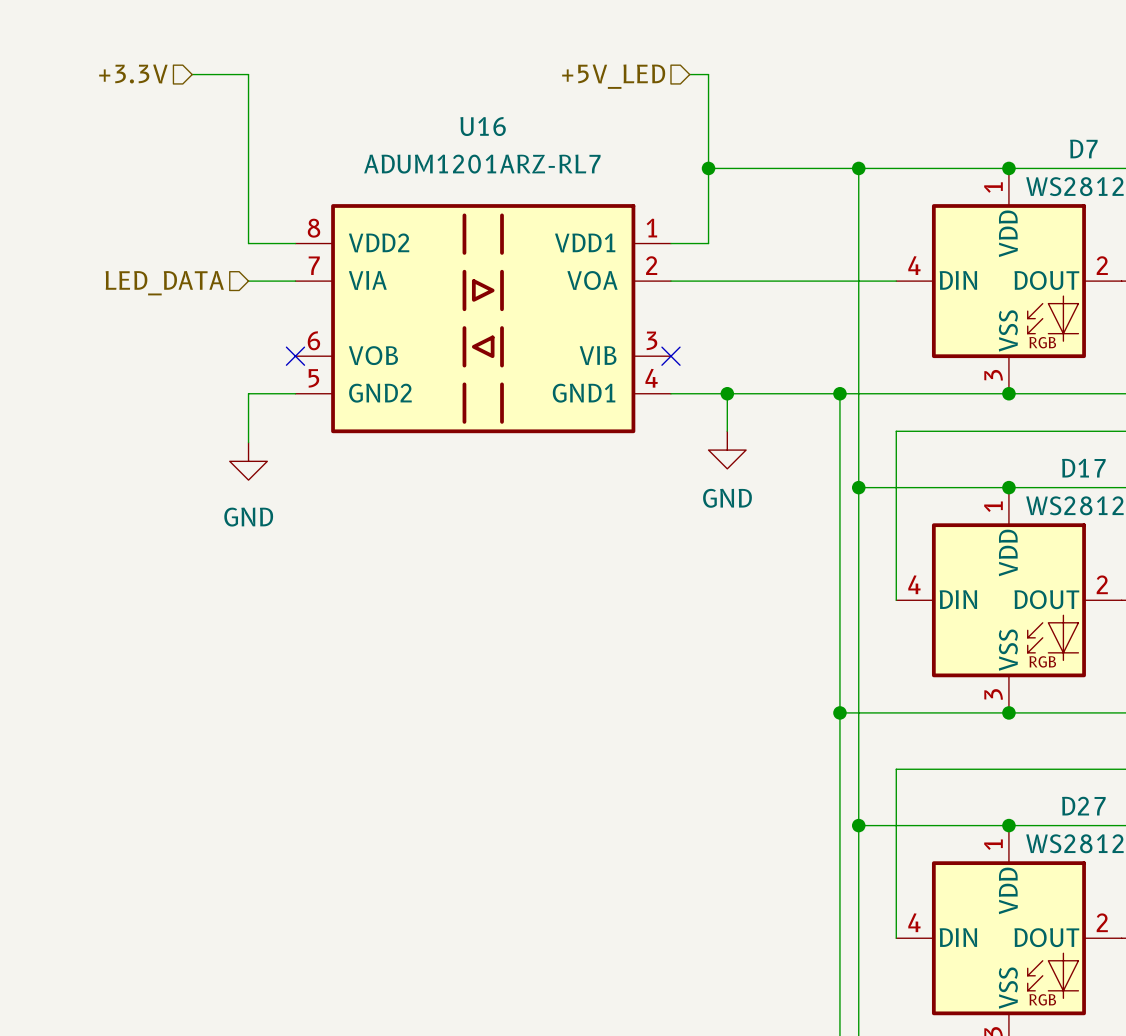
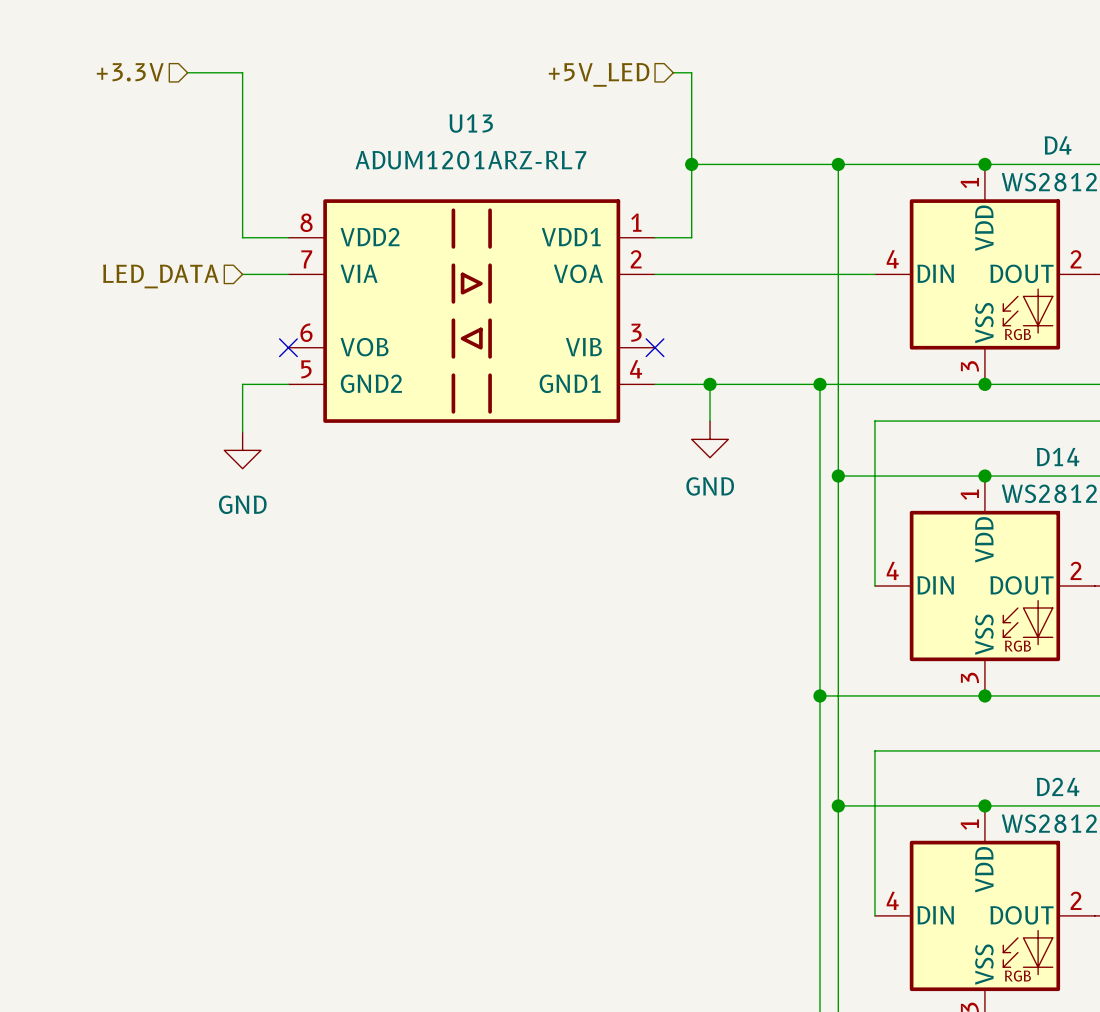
U16 name: U16 (483, 126) -> U13 (471, 123)
D7 name: D7 (1083, 149) -> D4 (1058, 145)
D17 name: D17 (1083, 468) -> D14 (1058, 457)
D27 name: D27 (1083, 806) -> D24 (1058, 786)

